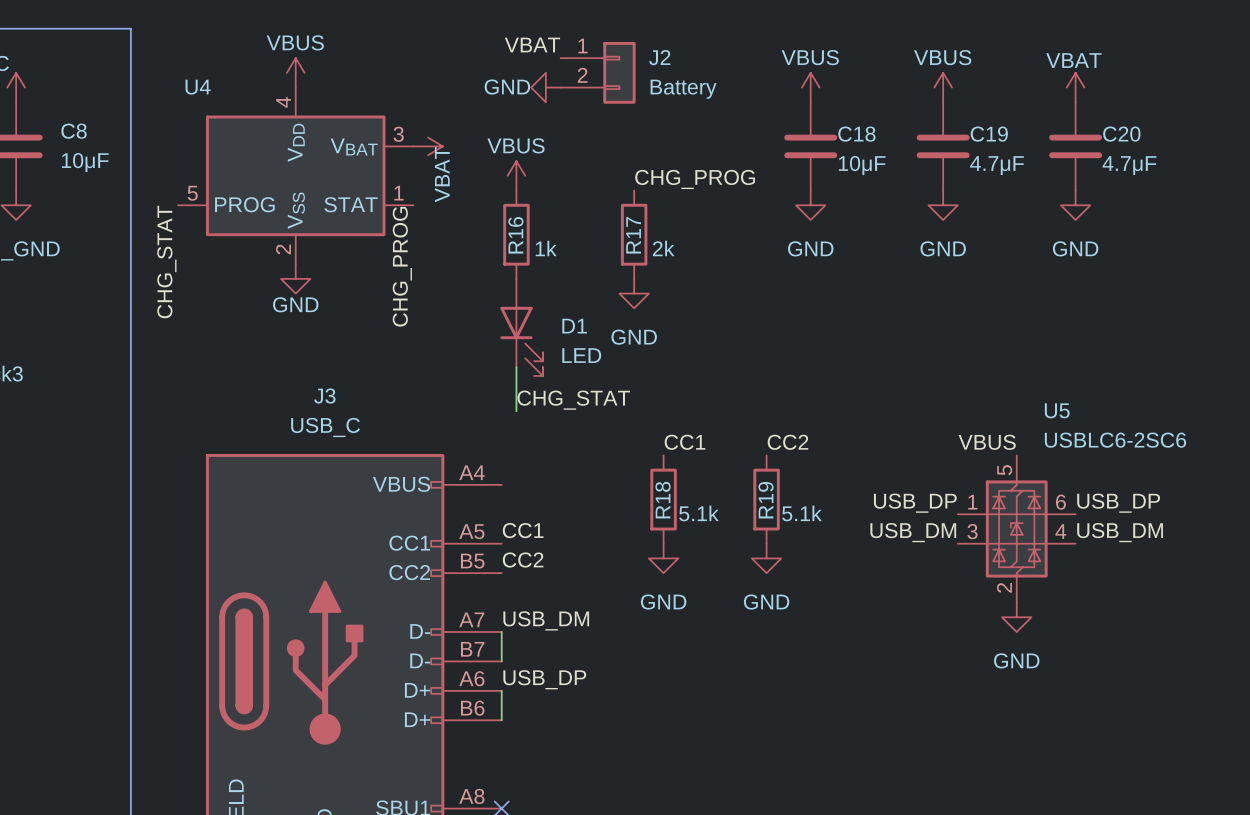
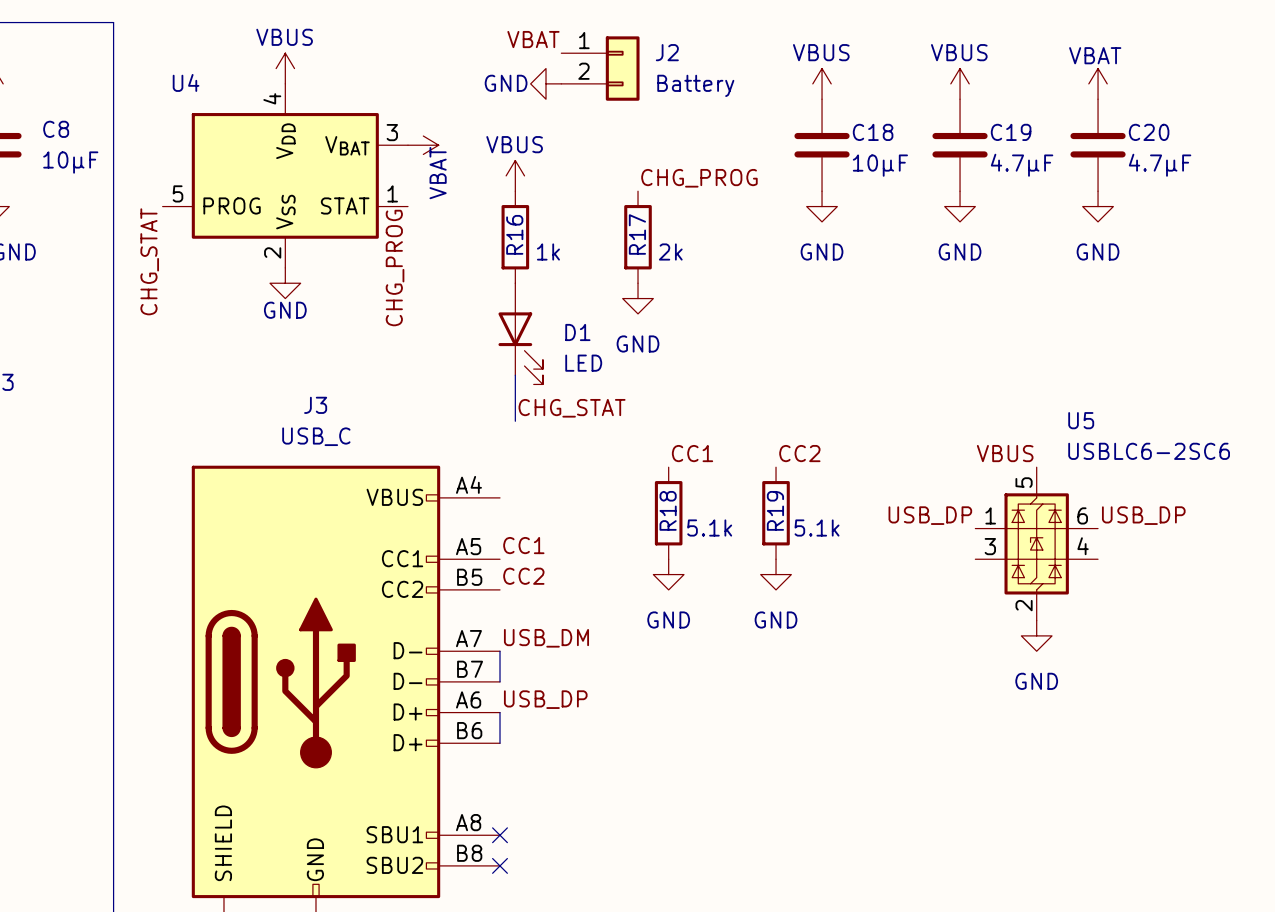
label: USB_DM (913, 532) -> none
label: USB_DM (1120, 532) -> none

